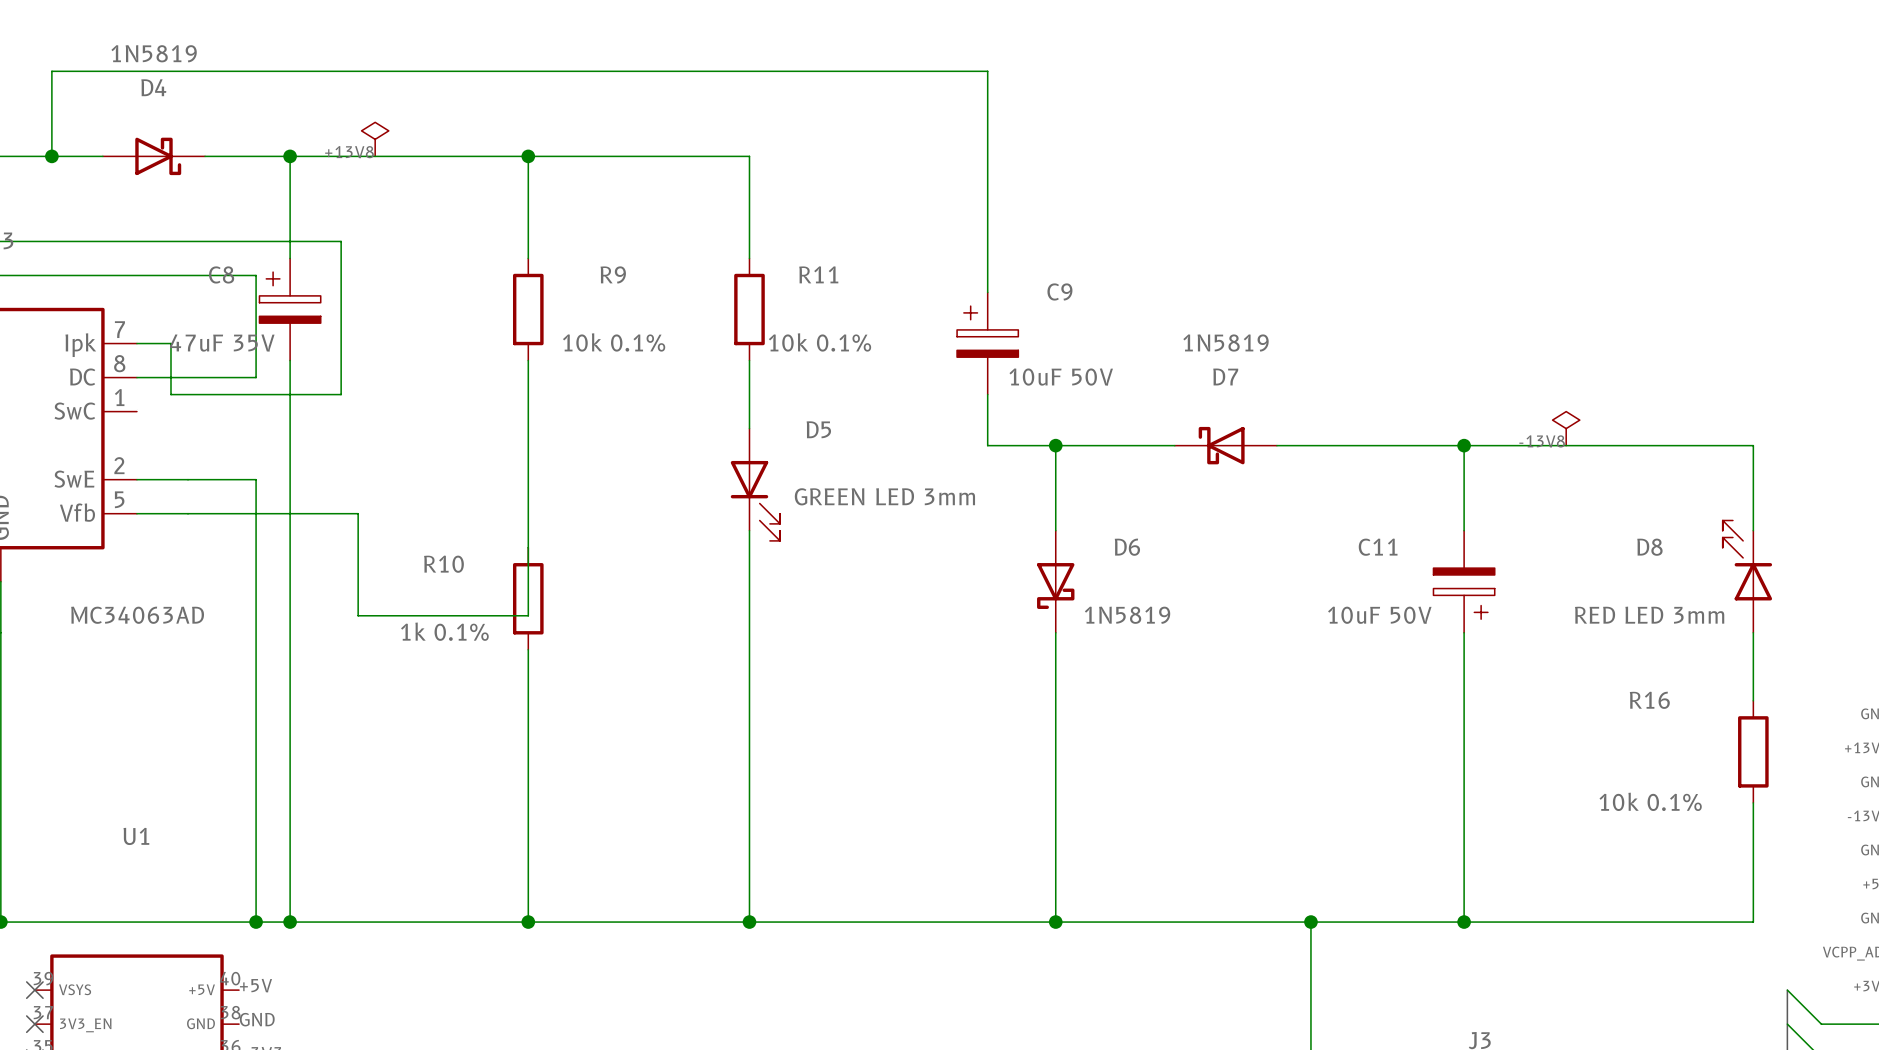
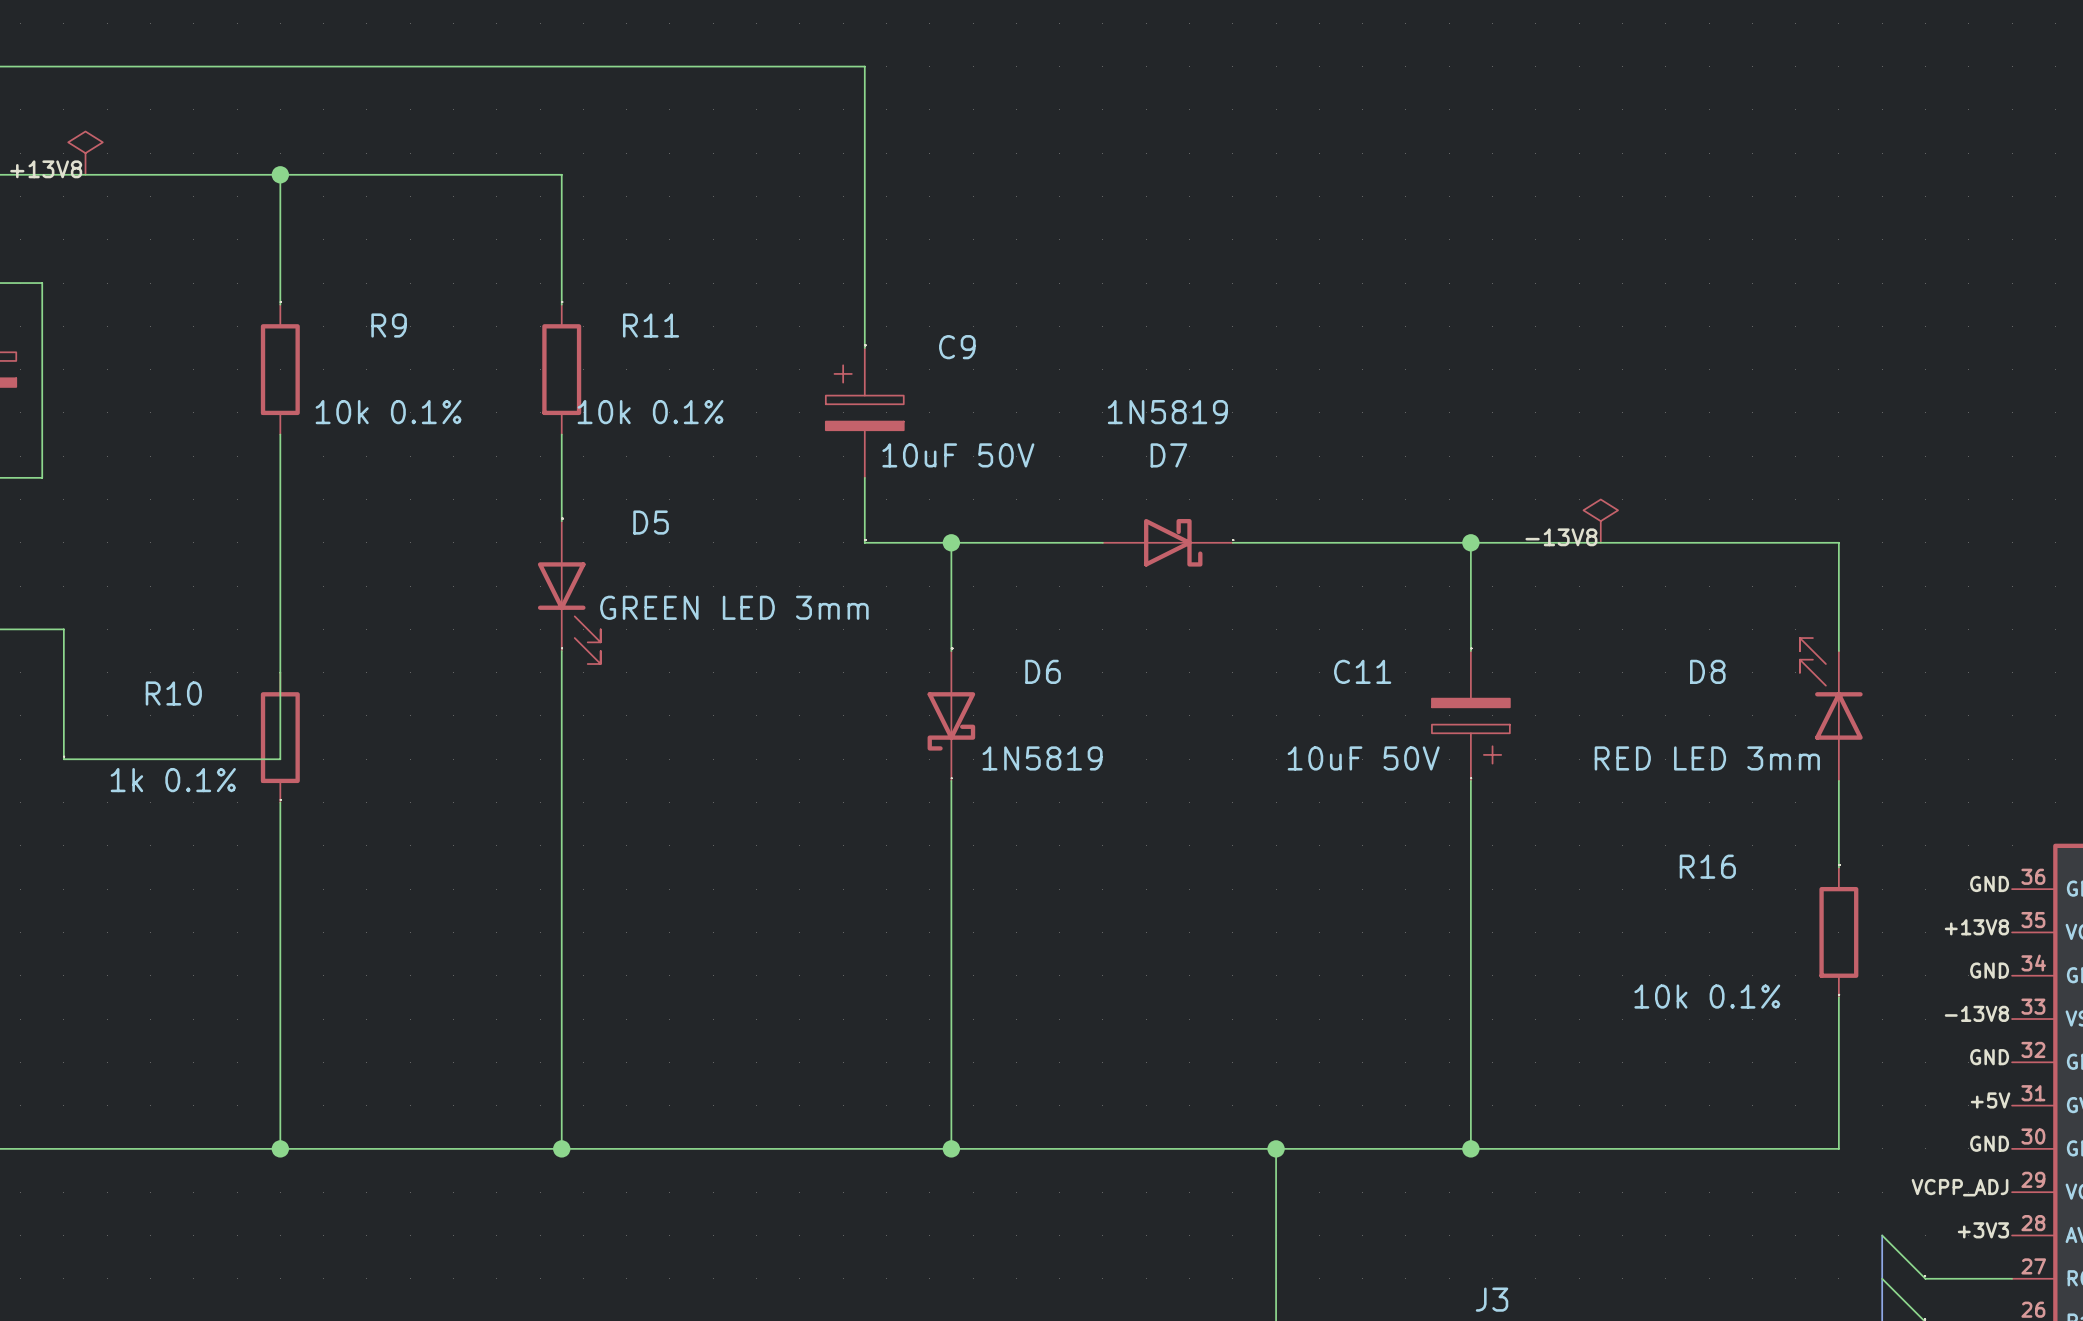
D7 rotation: 0° (1221, 445) -> 180° (1173, 542)

